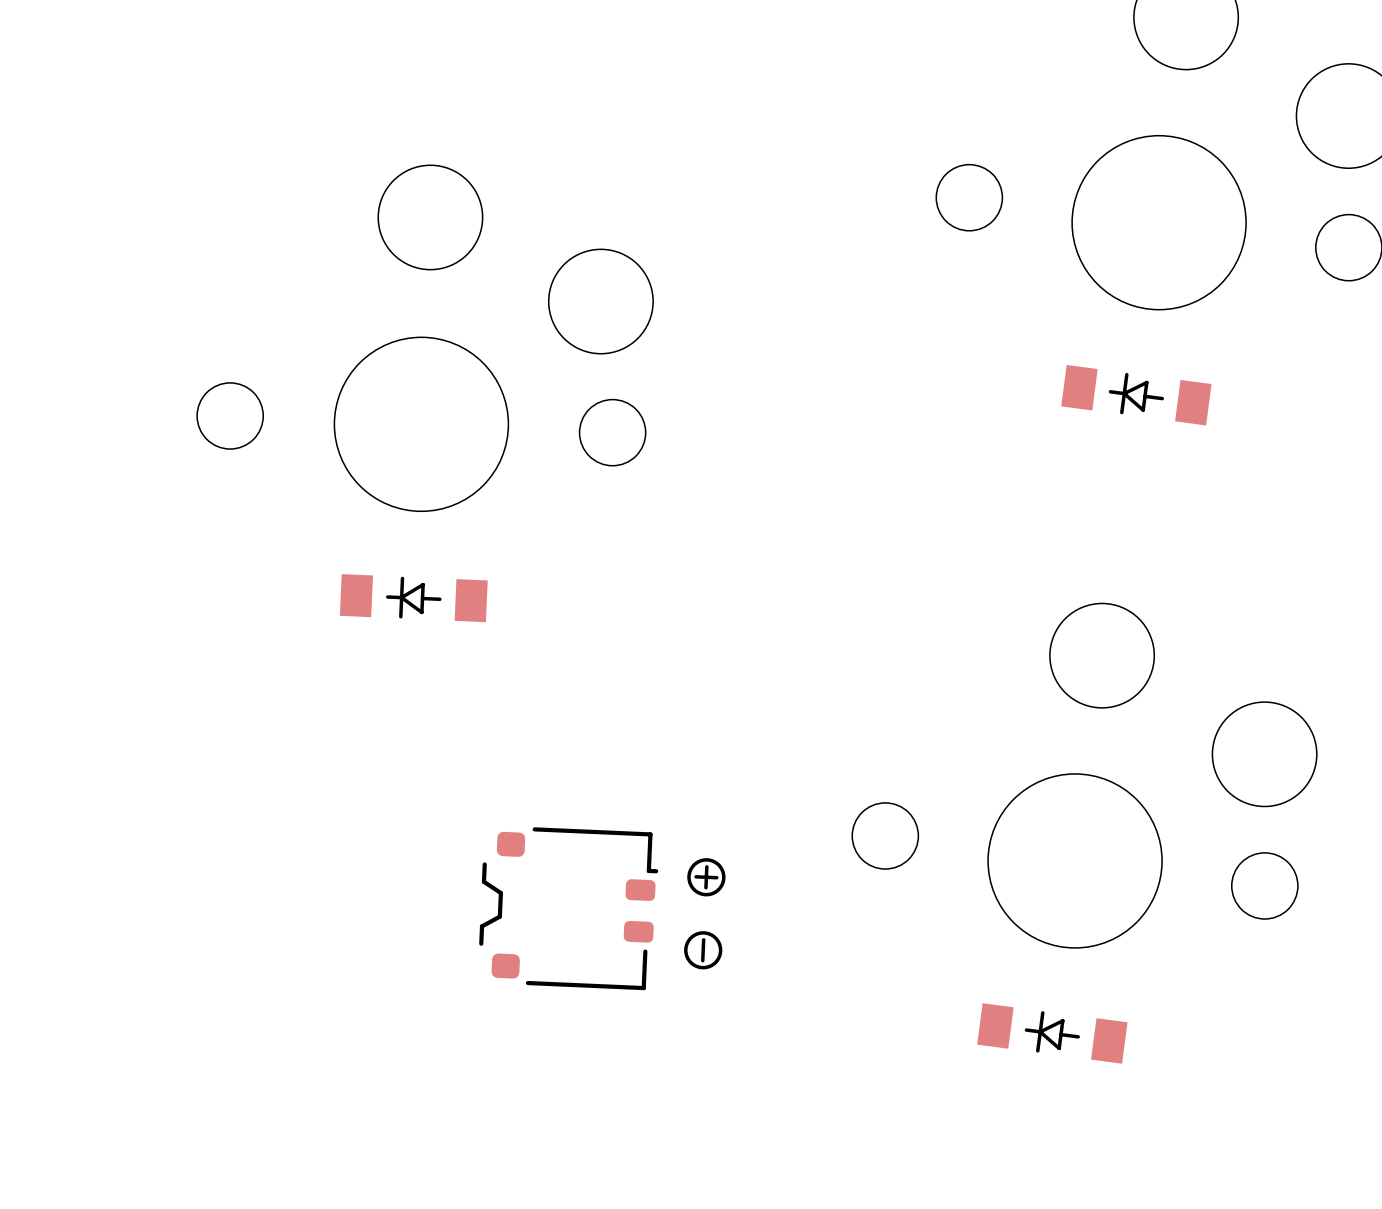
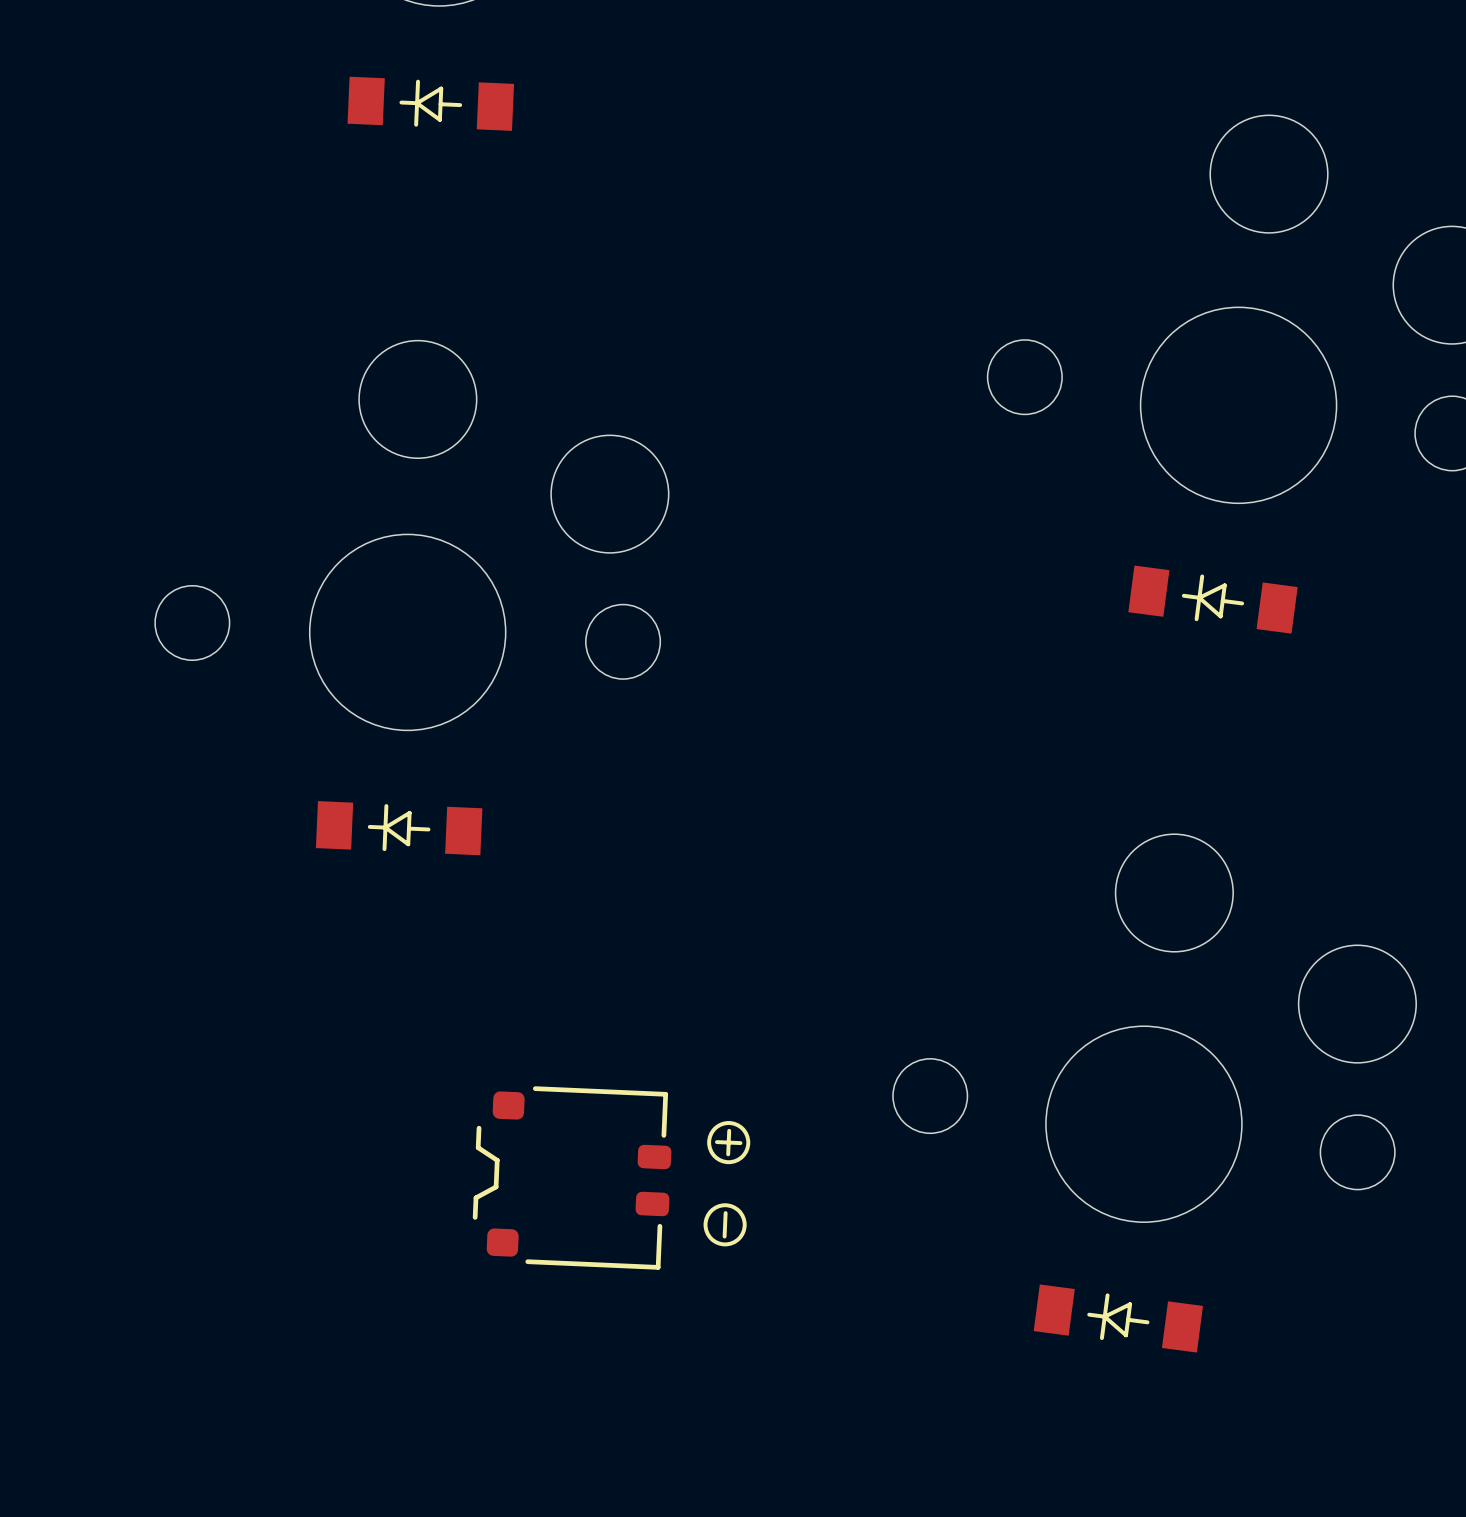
part footprint: [479, 827, 659, 991] -> [472, 1086, 672, 1270]

